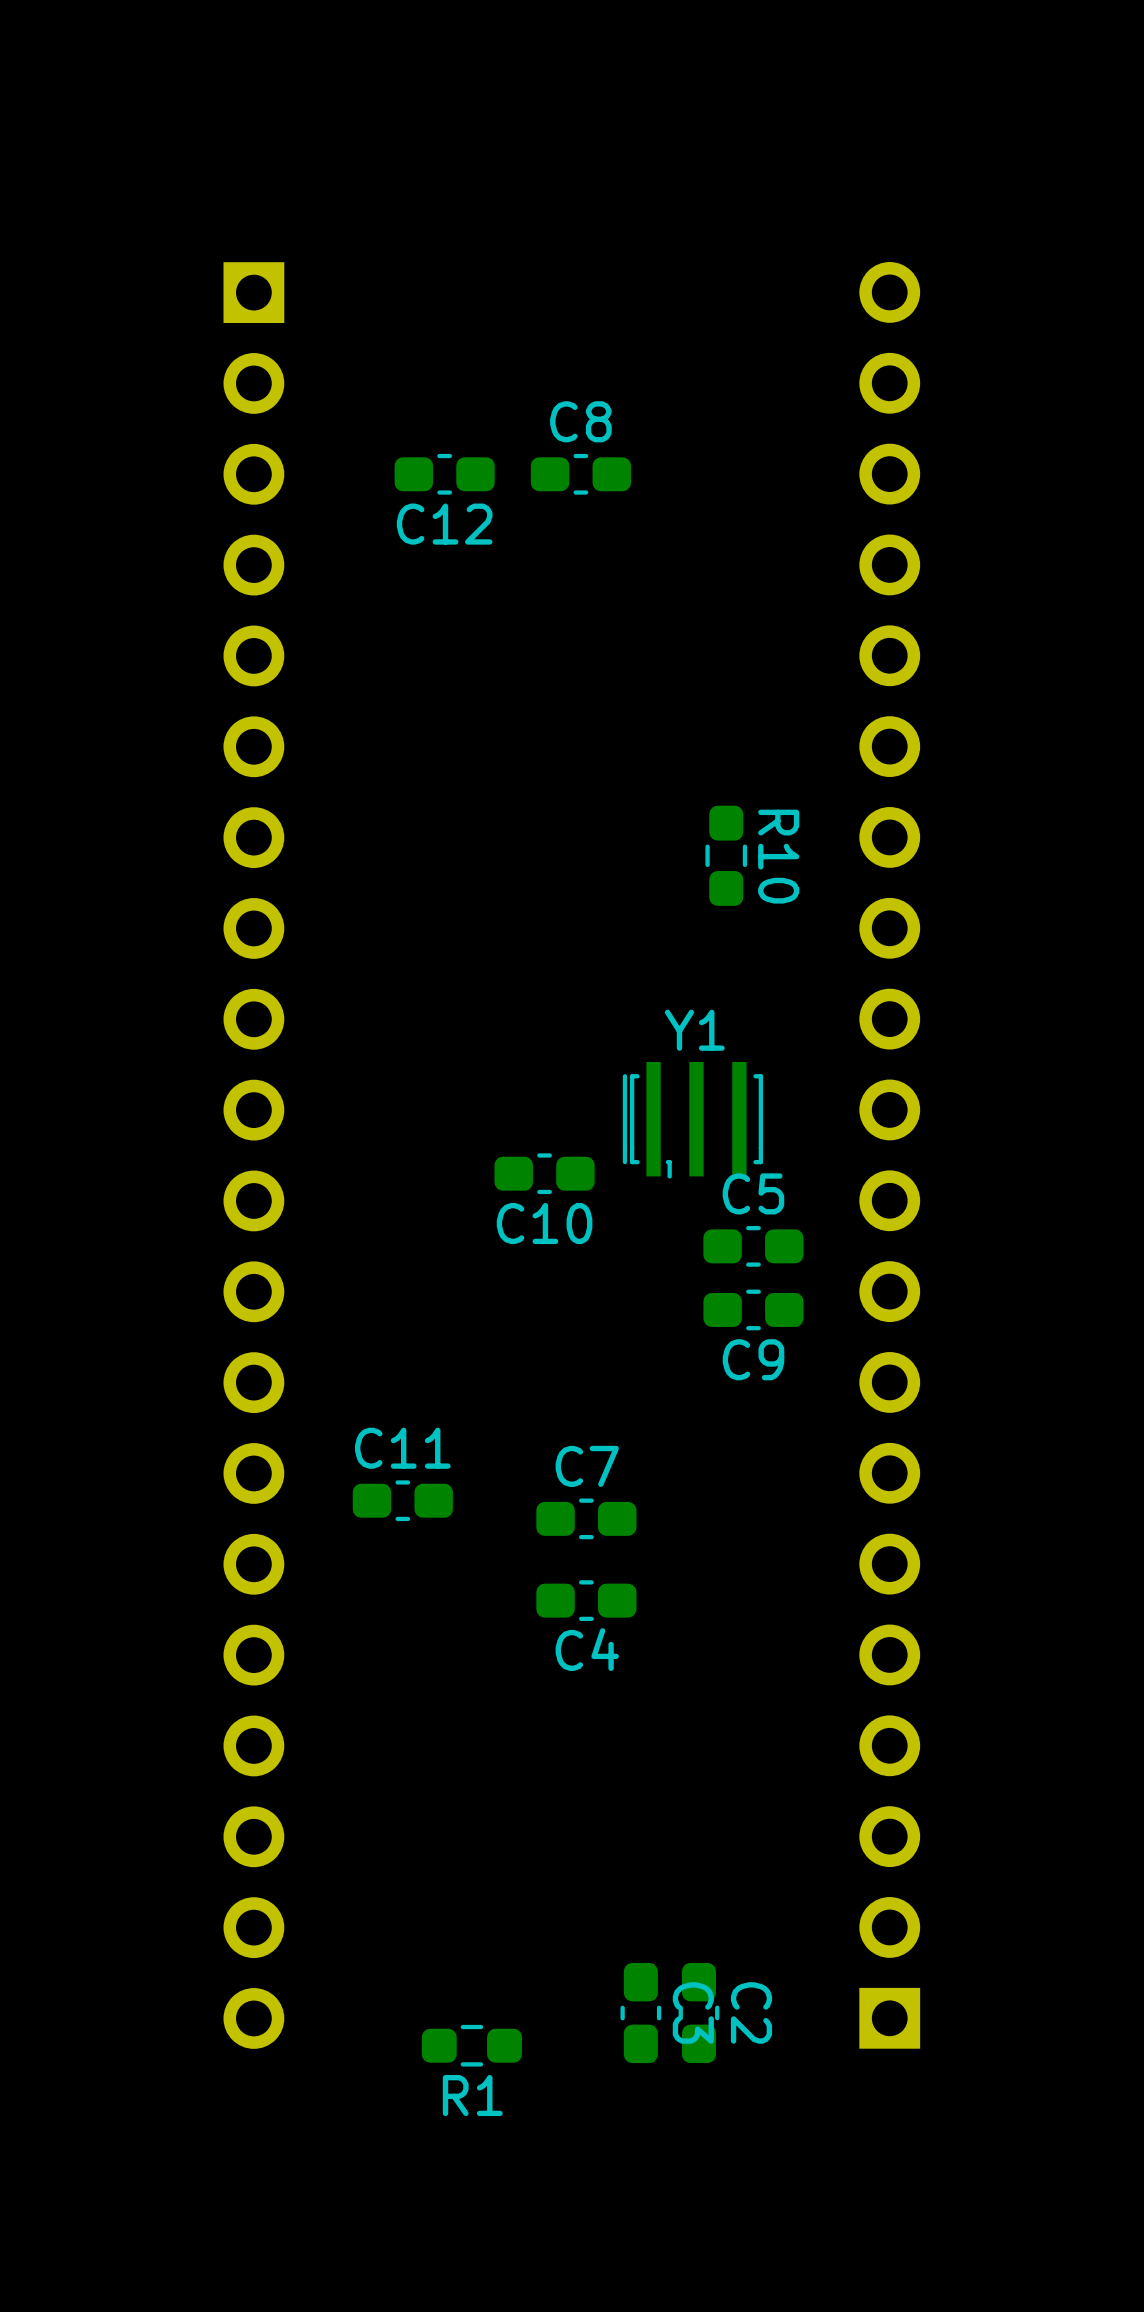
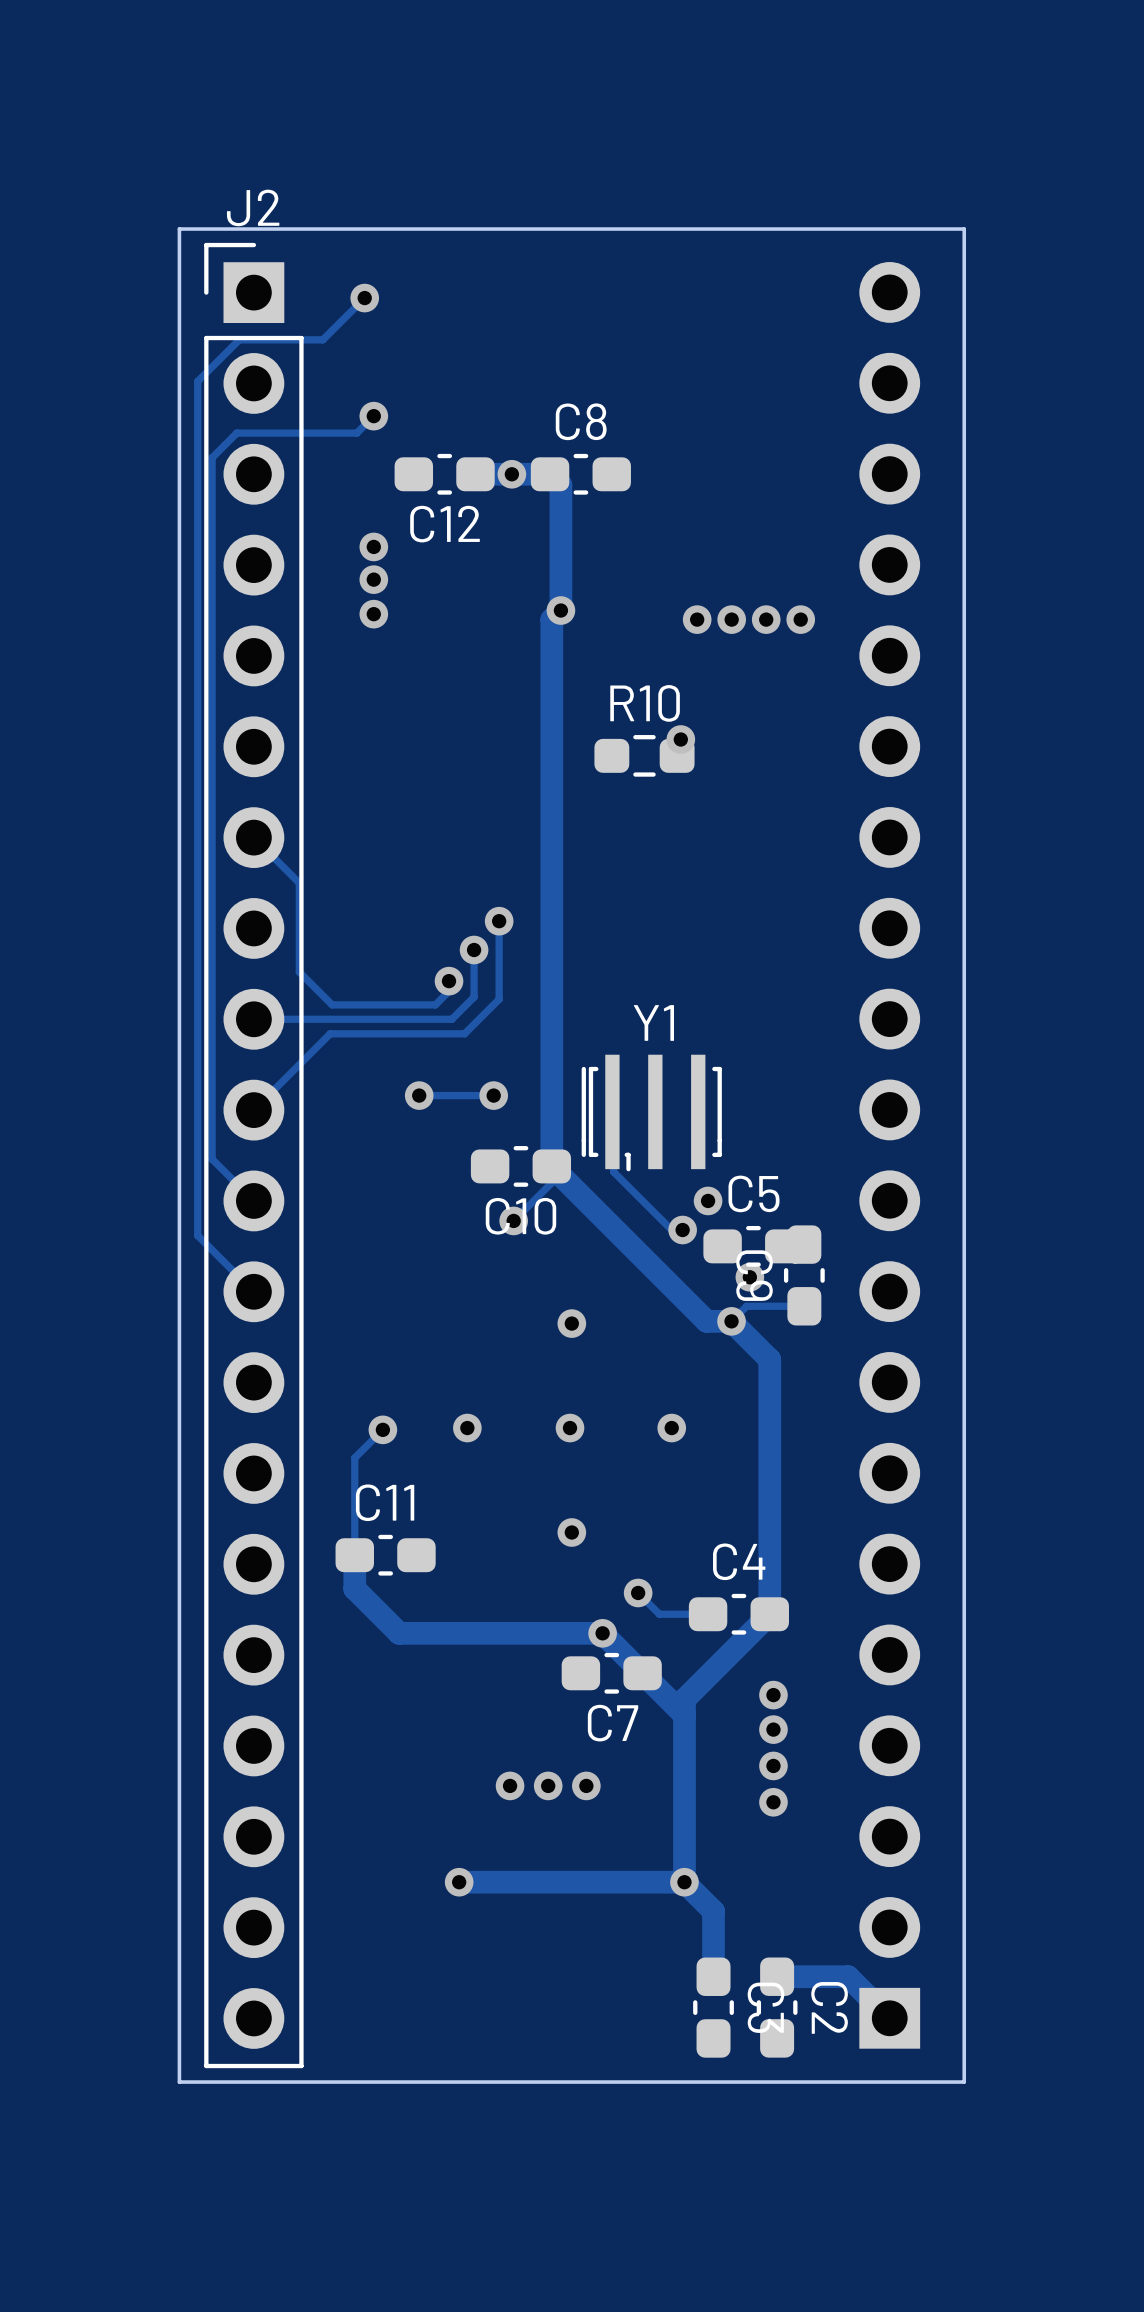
board edge: none -> (964, 229) (179, 229) (179, 2082) (964, 2082) (964, 229)
track: none -> (364, 298) (322, 339) (239, 339) (197, 381) (197, 1235) (253, 1291)
via: none -> (364, 298)
track: none -> (373, 416) (356, 433) (236, 433) (212, 457) (212, 1159) (253, 1200)
via: none -> (373, 416)
track: none -> (475, 474) (550, 474) (560, 485) (560, 610) (551, 619) (551, 1166)
via: none -> (511, 474)
via: none -> (373, 546)
via: none -> (373, 579)
via: none -> (560, 610)
via: none -> (373, 614)
via: none -> (697, 619)
via: none -> (731, 619)
via: none -> (766, 619)
via: none -> (800, 619)
via: none -> (680, 739)
track: none -> (253, 837) (299, 883) (299, 972) (332, 1004) (435, 1004) (449, 991) (449, 981)
R10 rotation: 0° (726, 855) -> 90° clockwise (644, 755)
R10 position: (726, 855) -> (644, 755)
R10 name position: R10 (778, 856) -> R10 (645, 703)
track: none -> (499, 921) (499, 999) (464, 1033) (330, 1033) (253, 1110)
via: none -> (499, 921)
track: none -> (474, 950) (474, 997) (451, 1019) (253, 1019)
via: none -> (474, 950)
via: none -> (449, 981)
via: none -> (419, 1095)
track: none -> (493, 1095) (419, 1095)
via: none -> (493, 1095)
track: none -> (613, 1113) (613, 1171) (671, 1230) (682, 1230)
Y1 position: (692, 1120) -> (651, 1113)
J2 side: top (253, 1155) -> bottom (253, 1155)
track: none -> (551, 1166) (706, 1321) (731, 1321)
track: none -> (551, 1166) (551, 1182) (513, 1220)
C10 position: (544, 1173) -> (520, 1166)
via: none -> (708, 1200)
via: none -> (513, 1220)
via: none -> (682, 1230)
via: none -> (749, 1277)
track: none -> (804, 1306) (746, 1306) (731, 1321)
C9 rotation: 0° (753, 1309) -> 90° clockwise (804, 1275)
C9 position: (753, 1309) -> (804, 1275)
track: none -> (731, 1321) (769, 1359) (769, 1614) (684, 1699) (684, 1882)
via: none -> (731, 1321)
via: none -> (571, 1323)
via: none -> (467, 1428)
via: none -> (570, 1428)
via: none -> (671, 1428)
track: none -> (382, 1429) (354, 1457) (354, 1588) (399, 1633) (602, 1633) (684, 1715)
via: none -> (382, 1429)
C7 name position: C7 (587, 1466) -> C7 (613, 1723)
C11 position: (402, 1500) -> (385, 1555)
C7 position: (586, 1518) -> (611, 1673)
via: none -> (571, 1532)
track: none -> (638, 1592) (659, 1614) (708, 1614)
via: none -> (638, 1592)
C4 position: (586, 1600) -> (738, 1614)
via: none -> (602, 1633)
C4 name position: C4 (587, 1649) -> C4 (739, 1561)
via: none -> (773, 1695)
via: none -> (773, 1729)
via: none -> (773, 1765)
via: none -> (510, 1785)
via: none -> (548, 1785)
via: none -> (586, 1785)
via: none -> (773, 1802)
via: none -> (459, 1882)
track: none -> (684, 1882) (713, 1911) (713, 1976)
track: none -> (684, 1882) (459, 1882)
via: none -> (684, 1882)
track: none -> (777, 1976) (848, 1976) (889, 2018)
C2 position: (698, 2012) -> (777, 2007)
C3 position: (640, 2013) -> (713, 2007)
R1: (471, 2045) -> none

